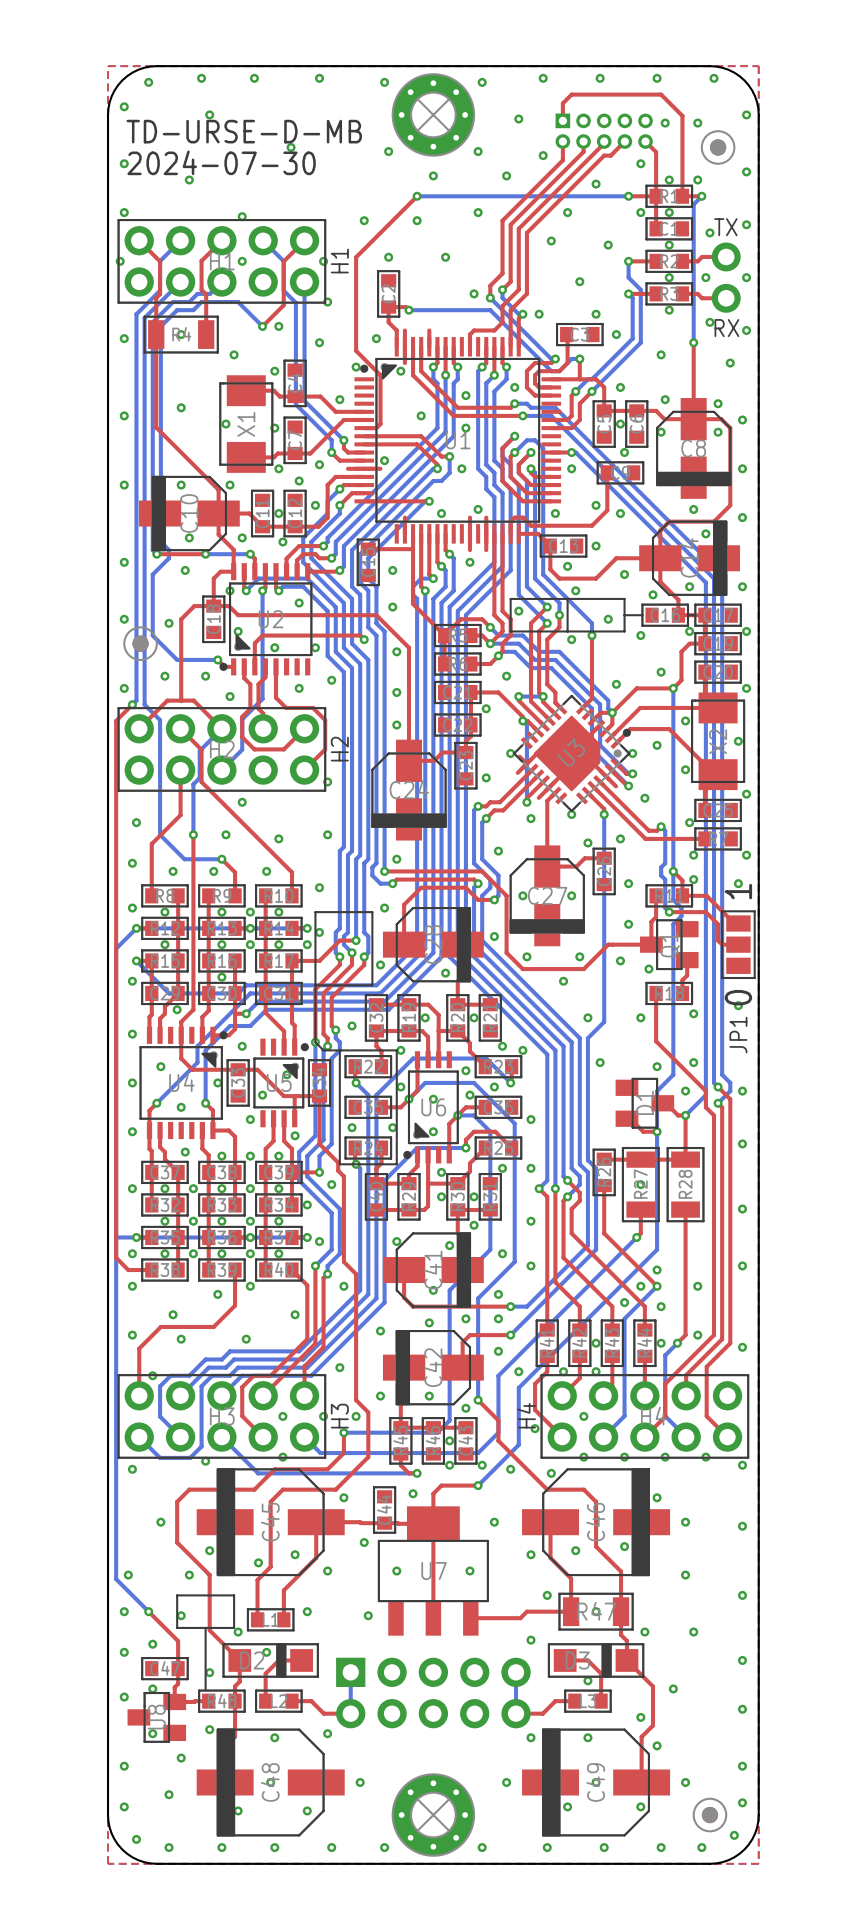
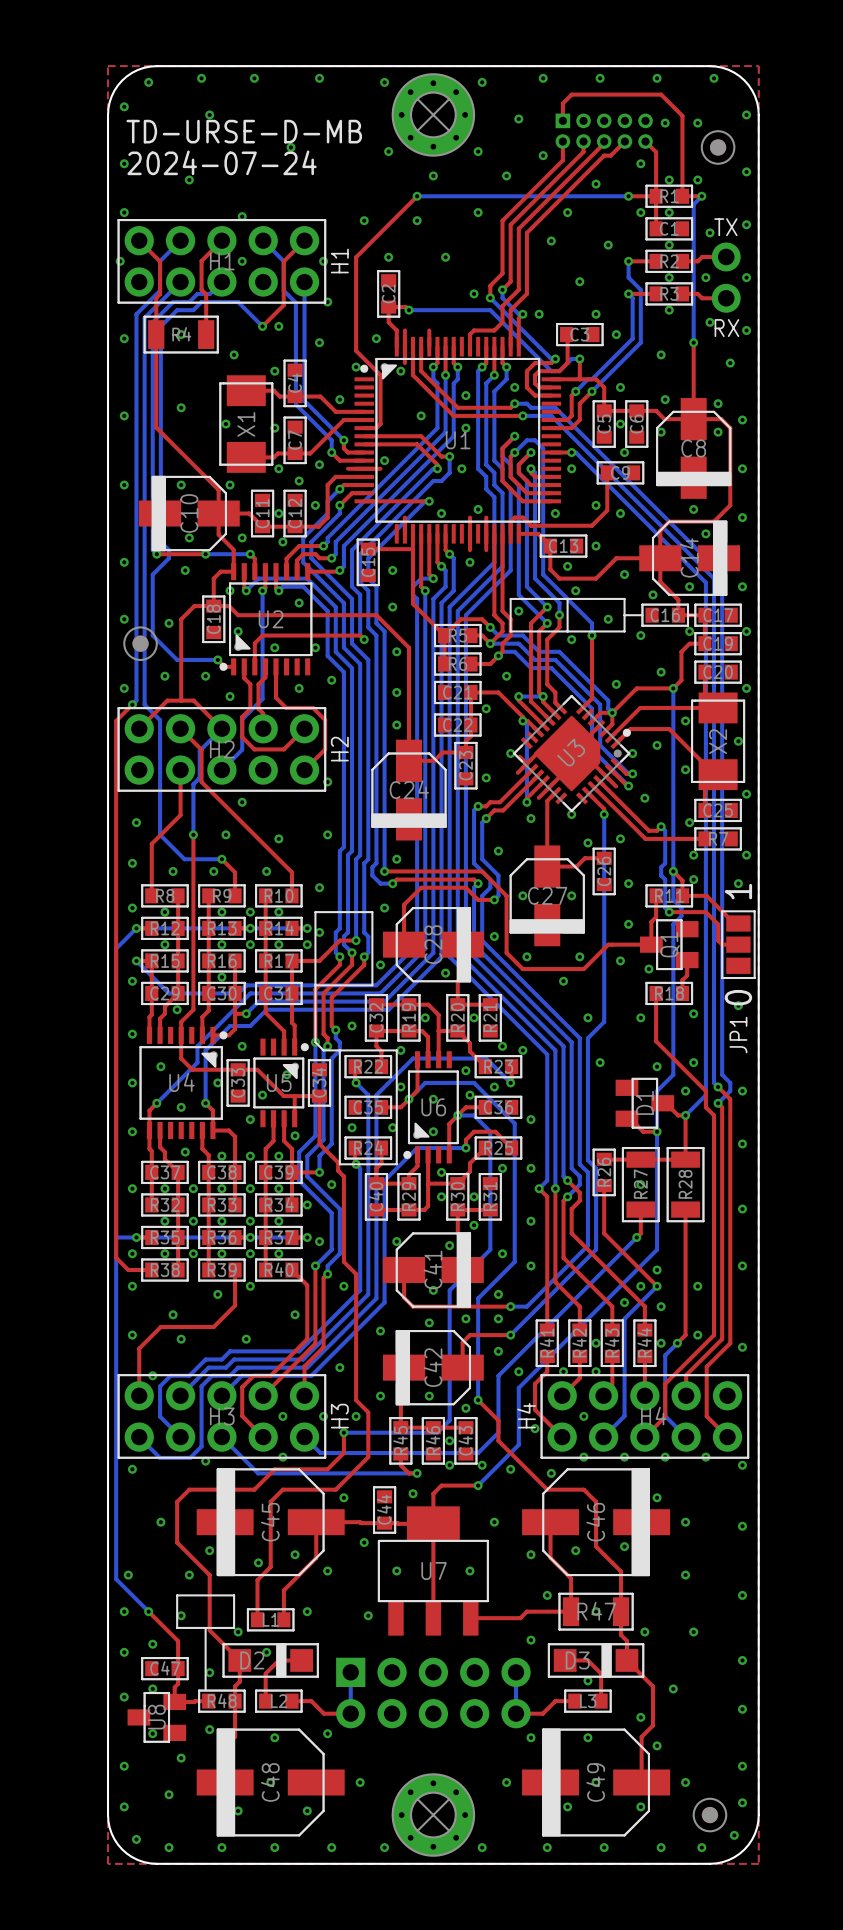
text: 2024-07-30 (221, 162) -> 2024-07-24 (222, 162)

